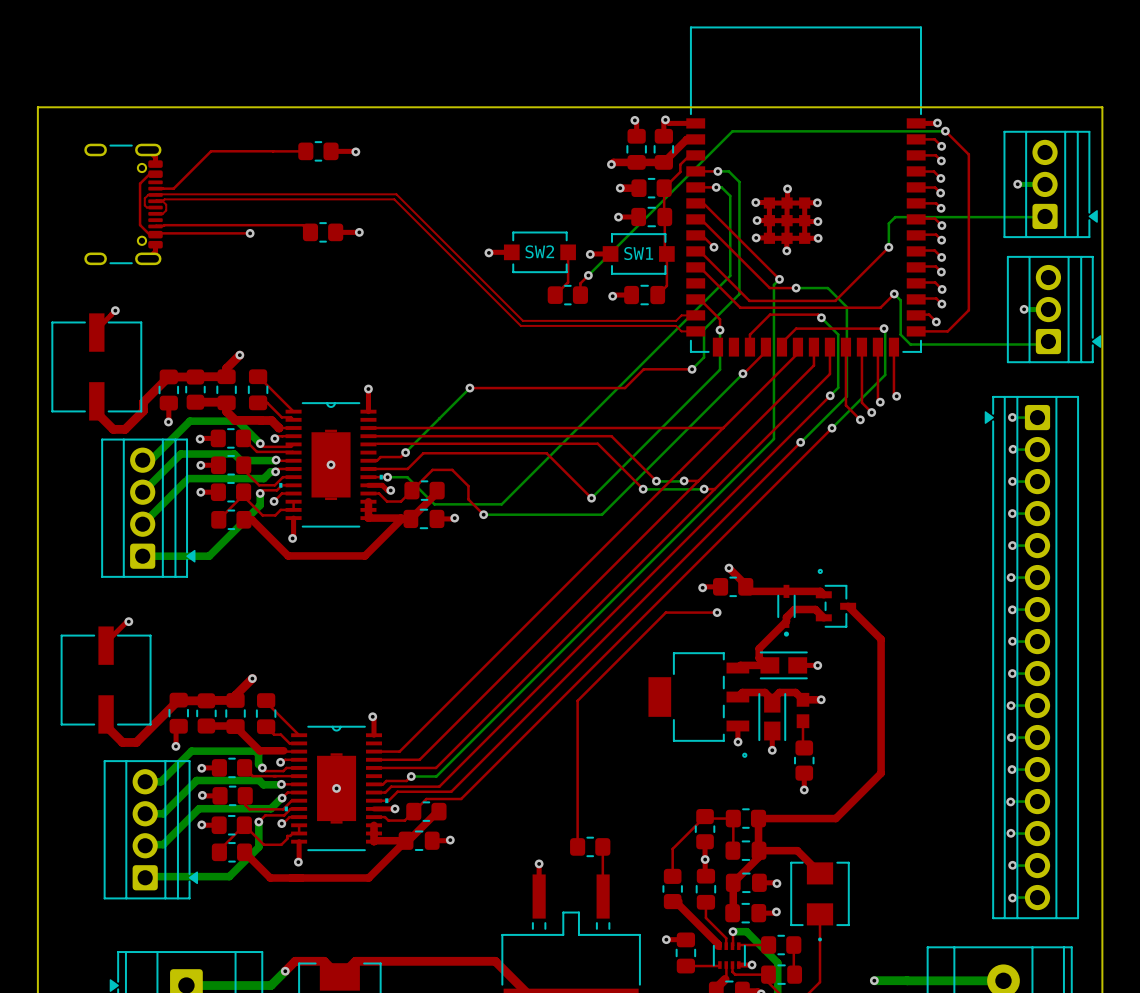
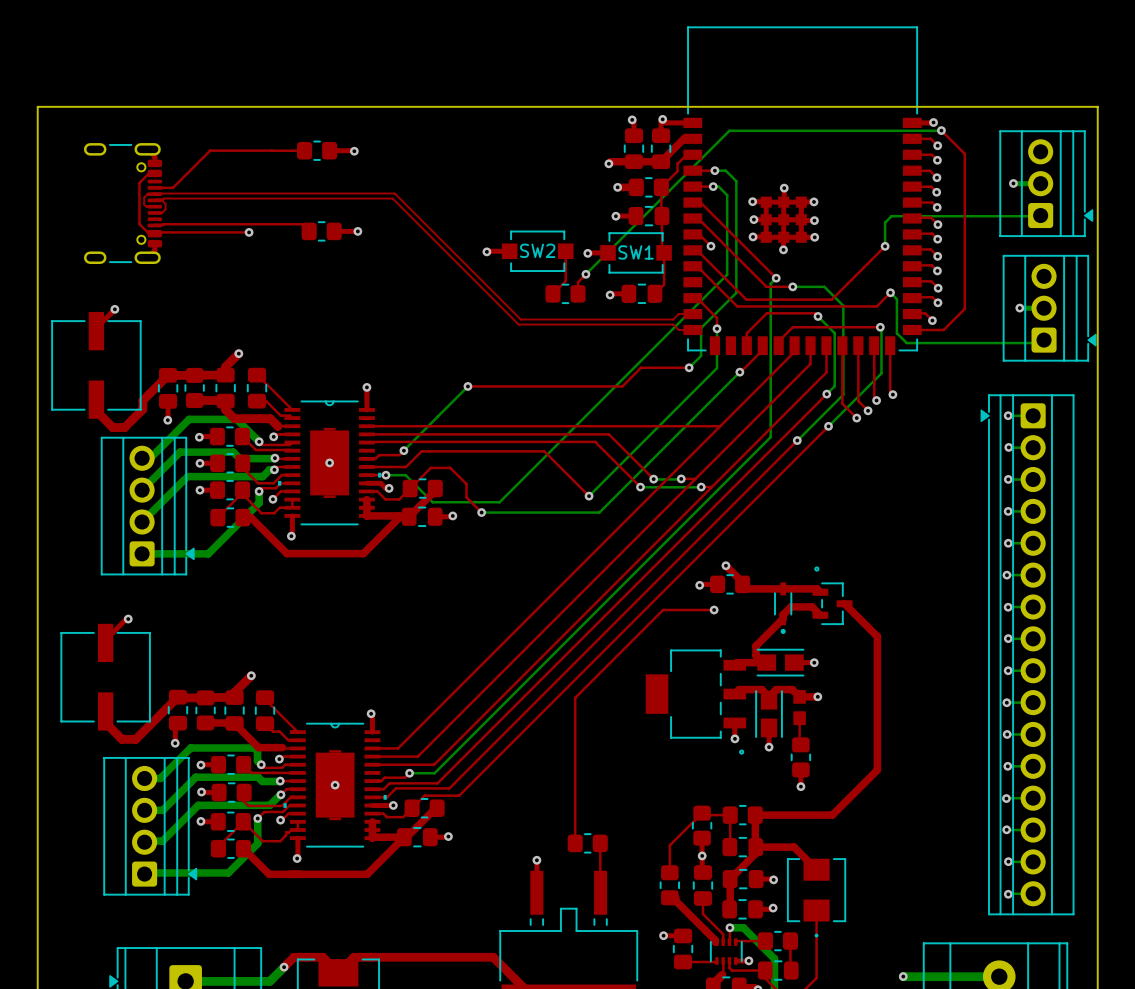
bottom track: (874, 980) (907, 980) -> none
via: (874, 980) -> none
via: none -> (903, 976)

